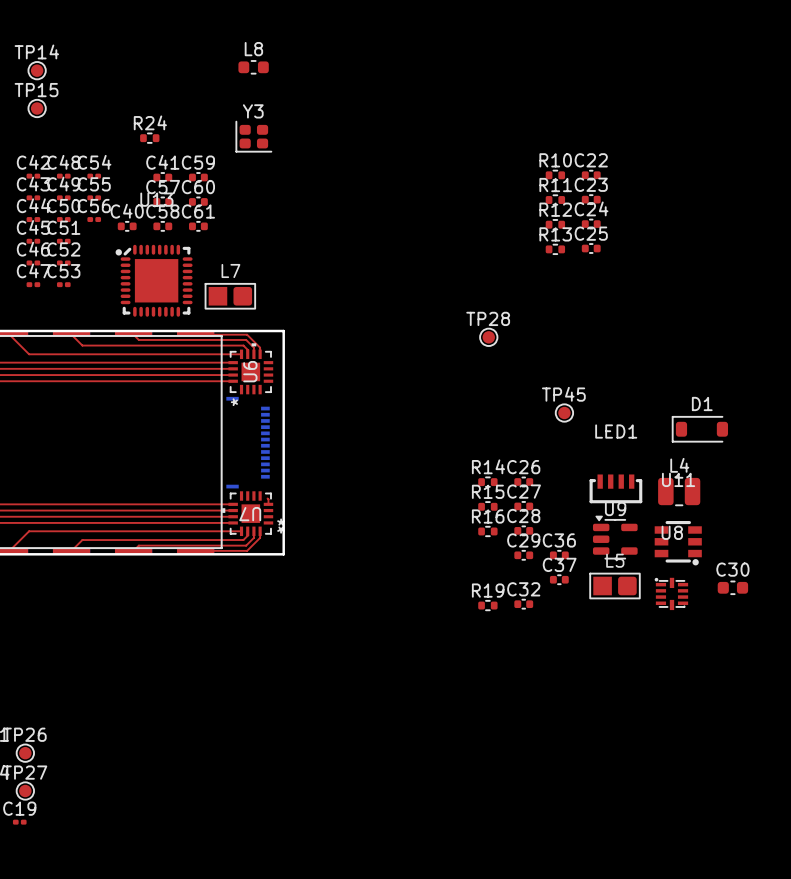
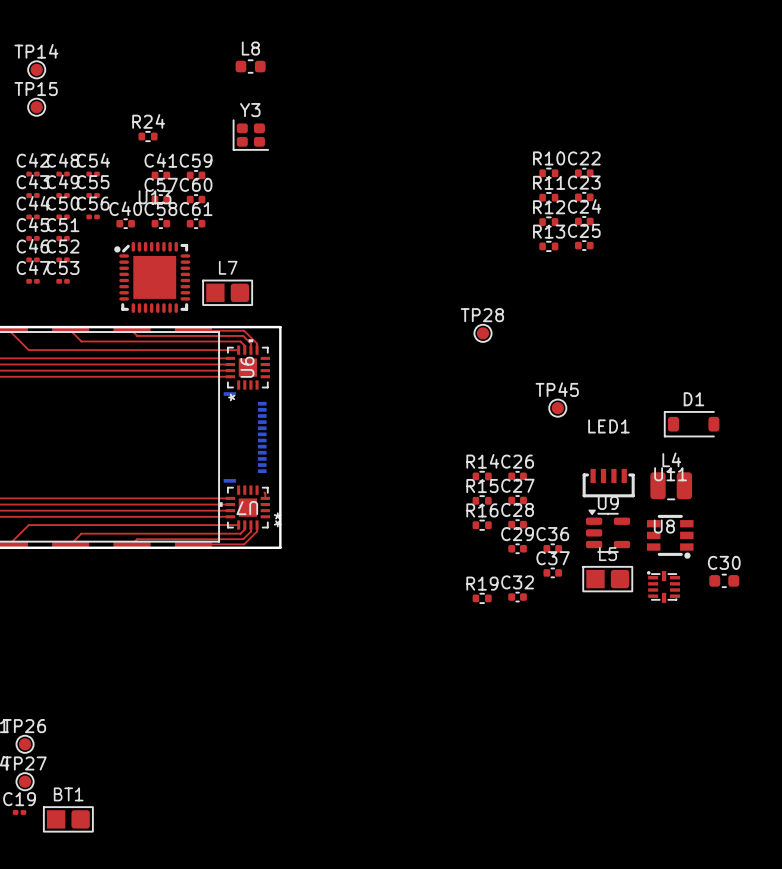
BT1: none -> (68, 819)

